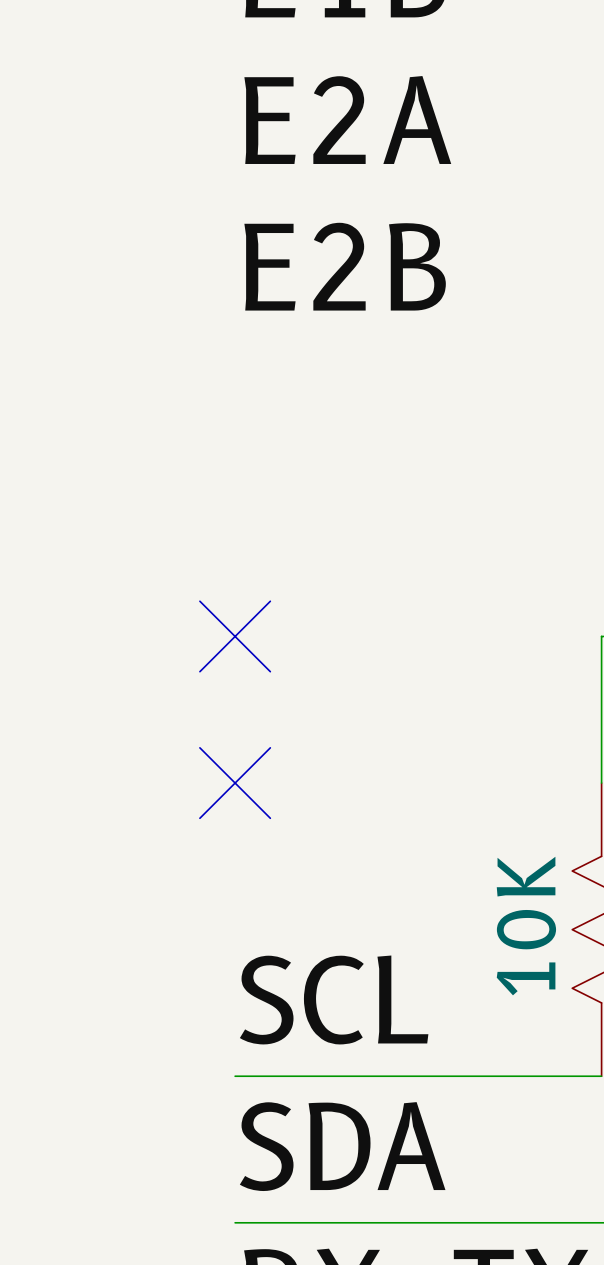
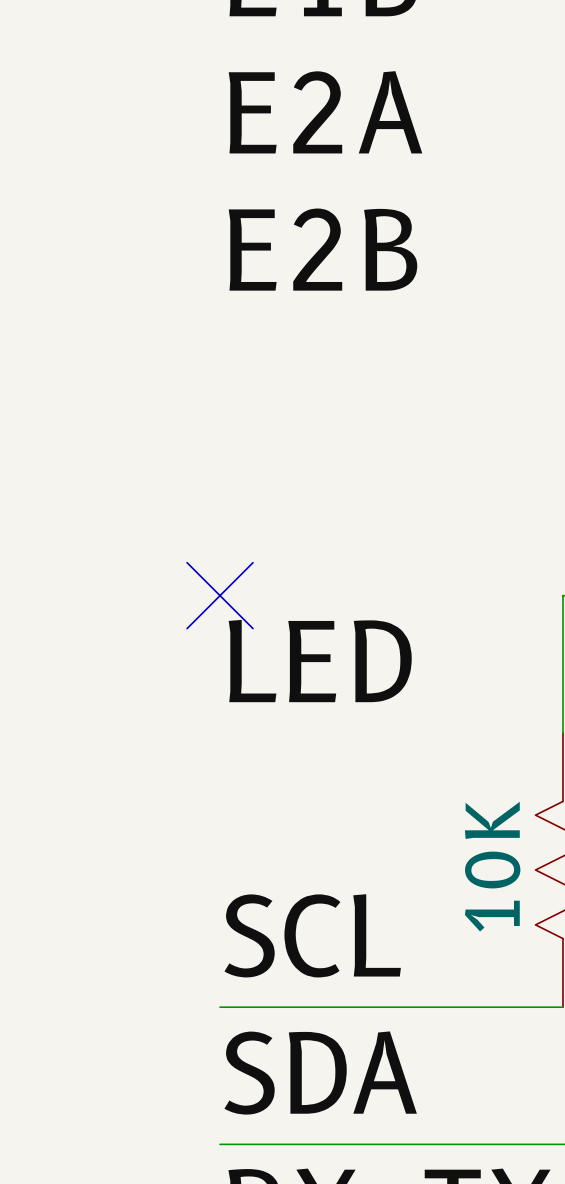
label: none -> LED (320, 661)
no-connect mark: (235, 783) -> none

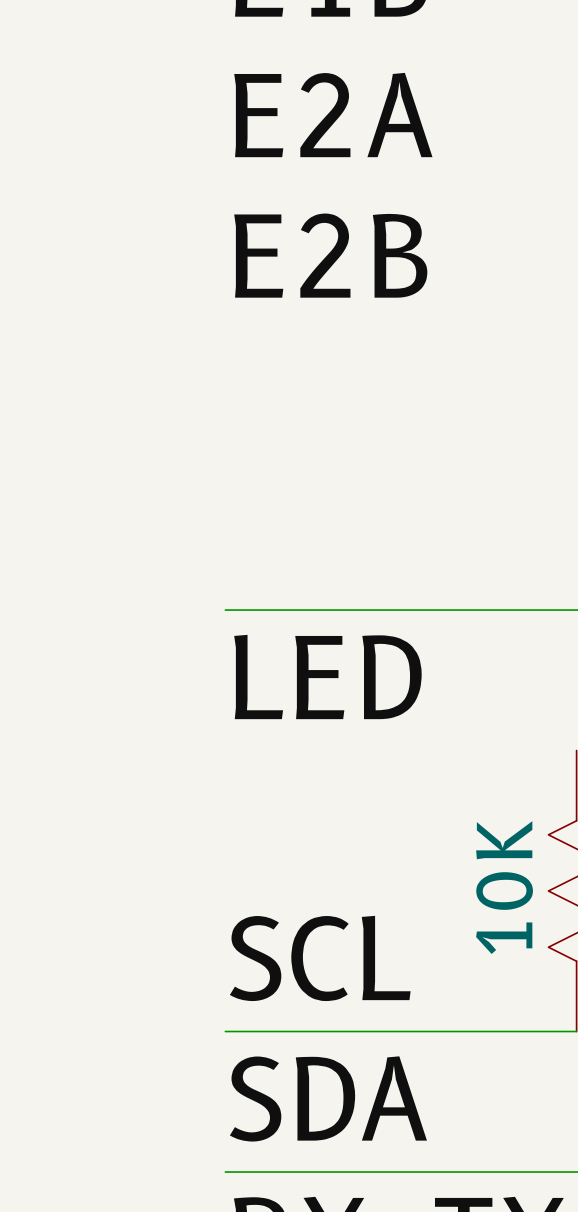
no-connect mark: (220, 595) -> none
wire: (562, 595) (562, 732) -> (576, 610) (225, 610)

